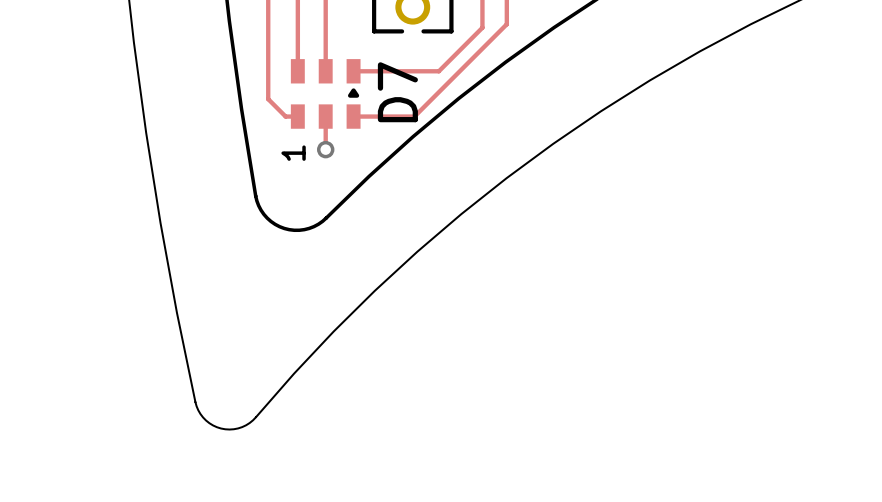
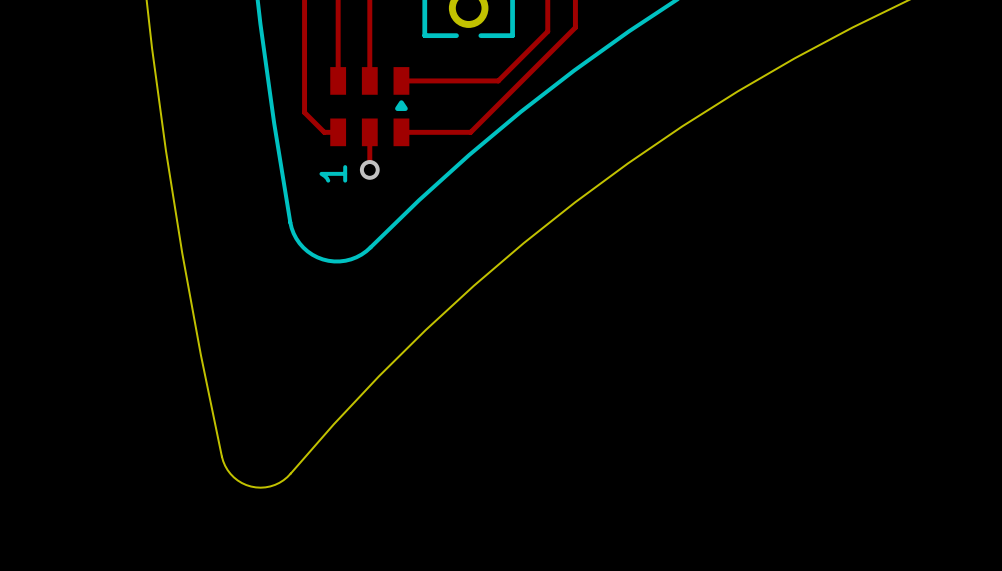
D7 name: D7 (397, 92) -> none

